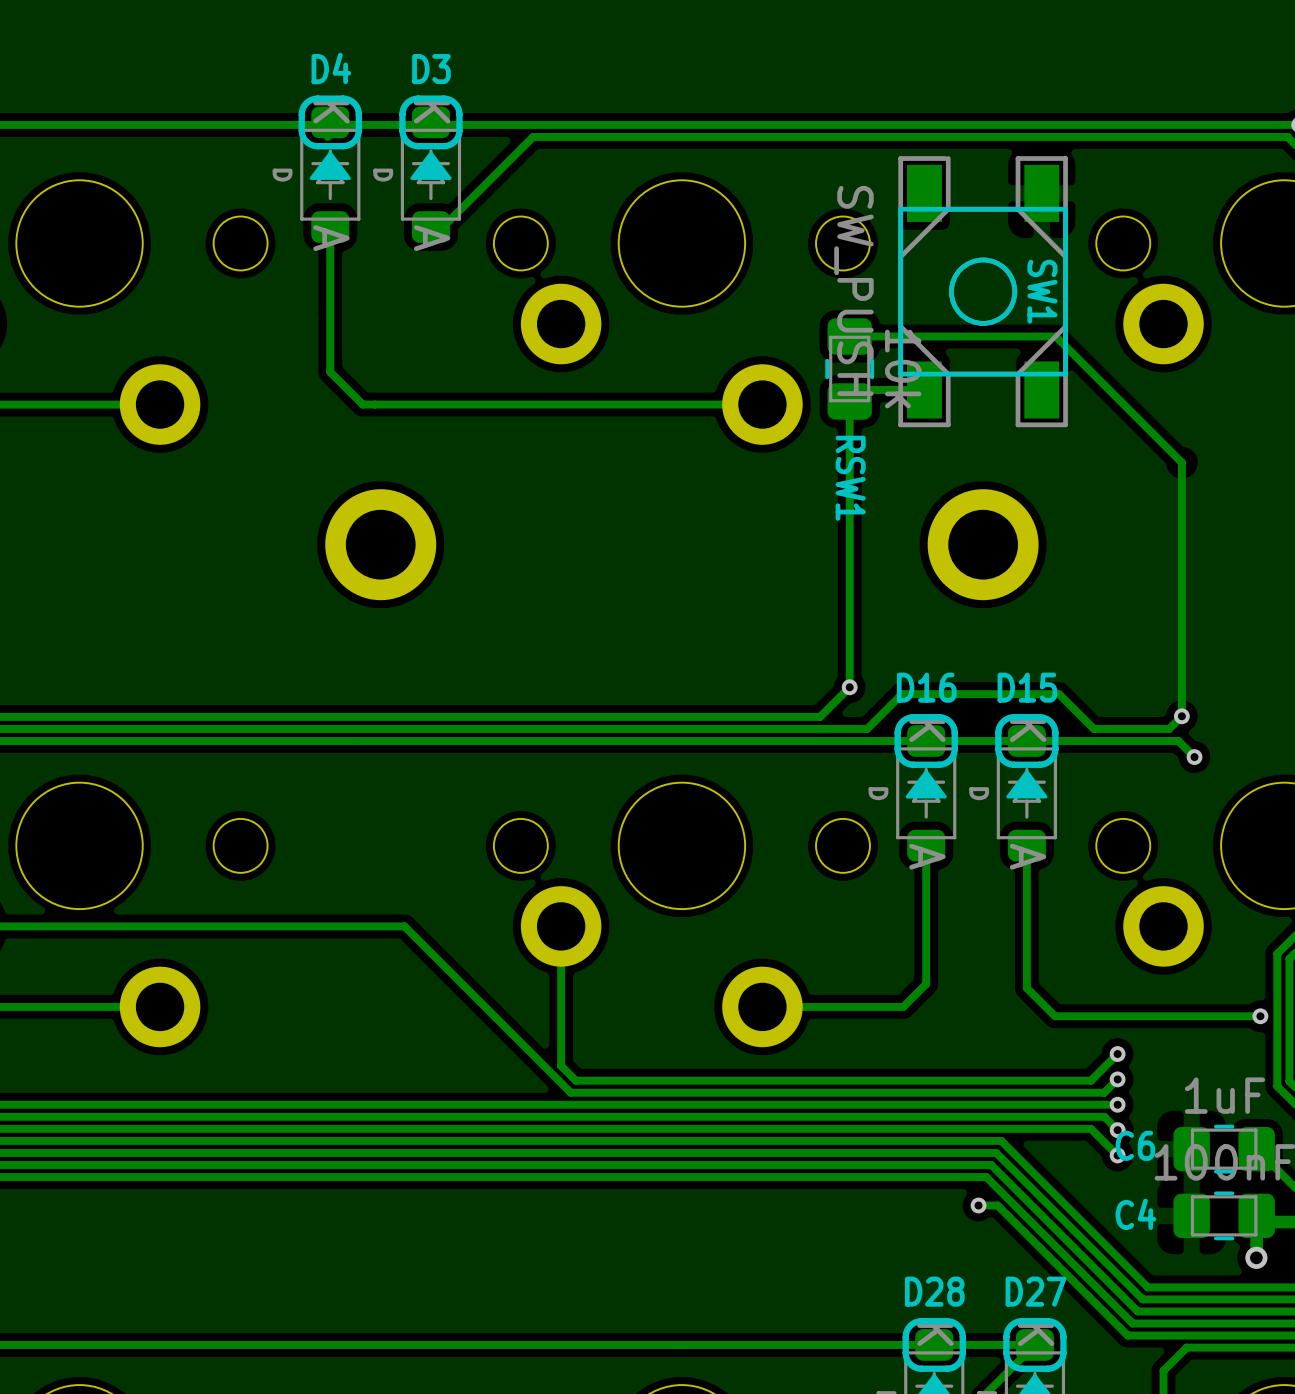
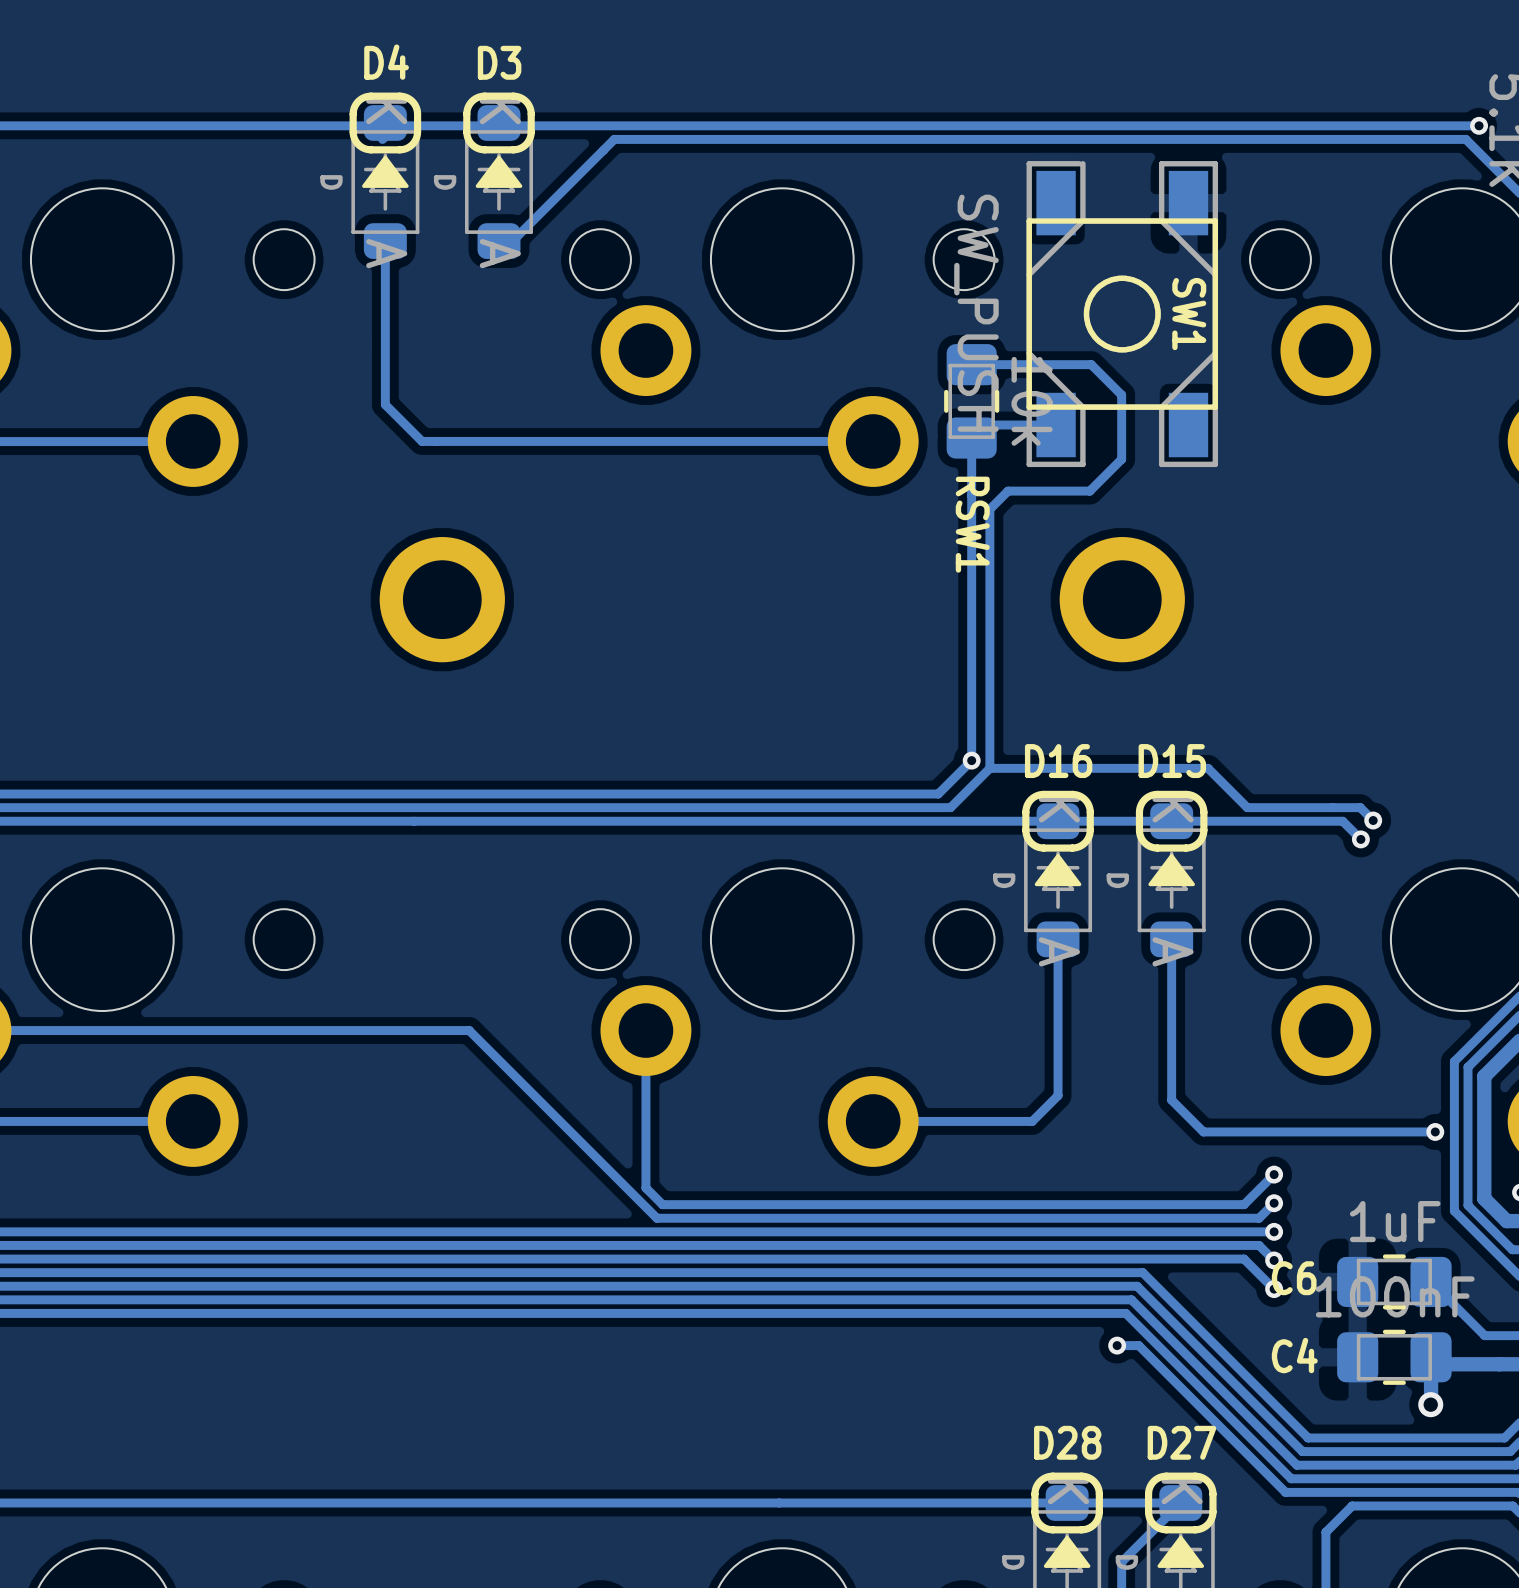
track: (955, 336) (1055, 336) (1181, 462) (1181, 716) (1169, 728) -> (1091, 364) (1121, 395) (1121, 459) (1089, 491) (1008, 491) (989, 509) (989, 768)
track: (902, 694) (867, 728) (831, 728) -> (989, 768) (950, 807)
track: none -> (1030, 768) (989, 768)
via position: (1181, 716) -> (1373, 820)
track: none -> (1332, 807) (1360, 807) (1373, 820)

